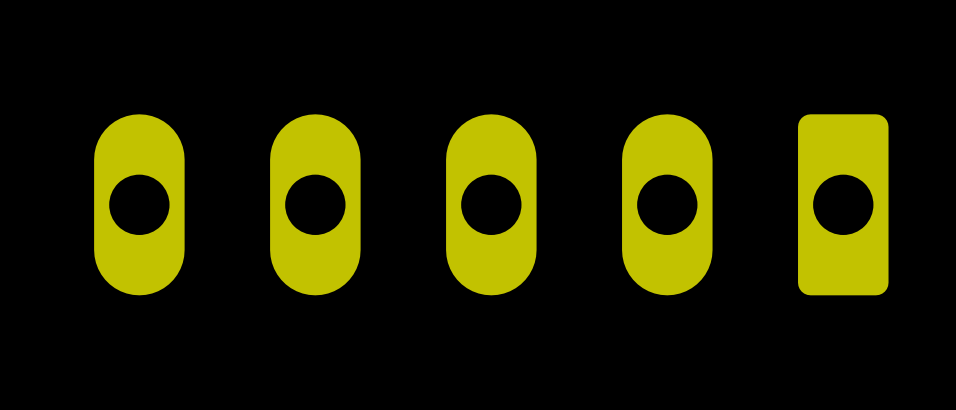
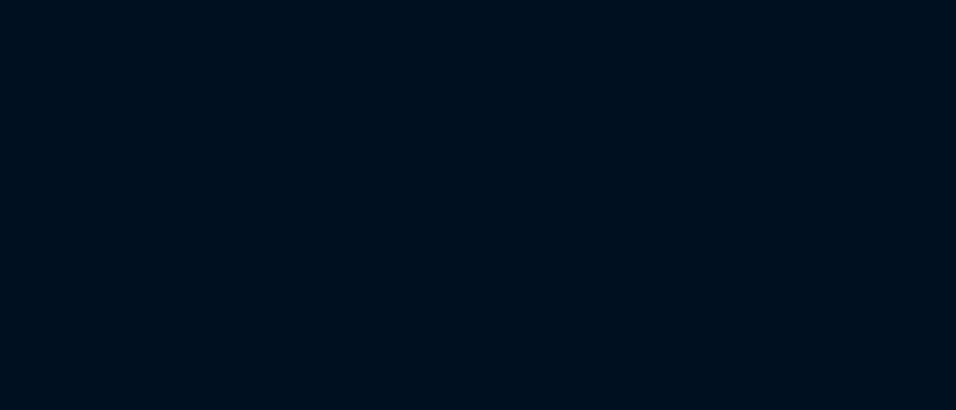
part: (491, 204) -> none

